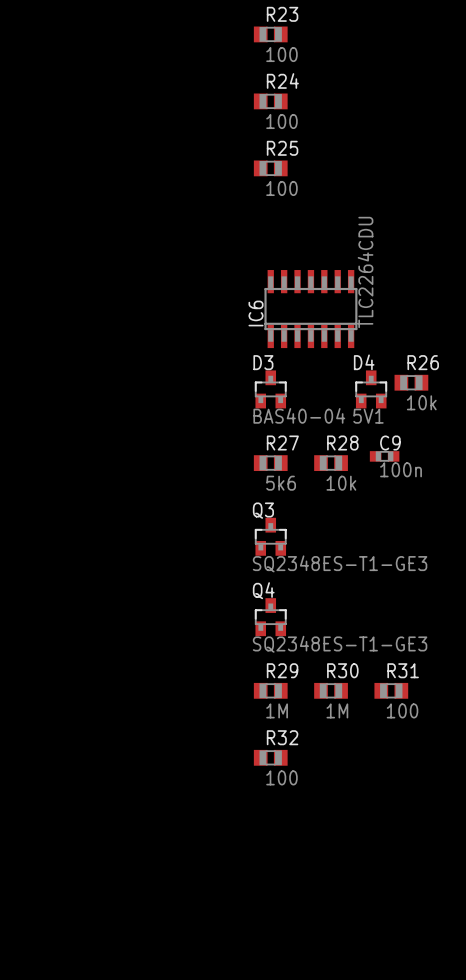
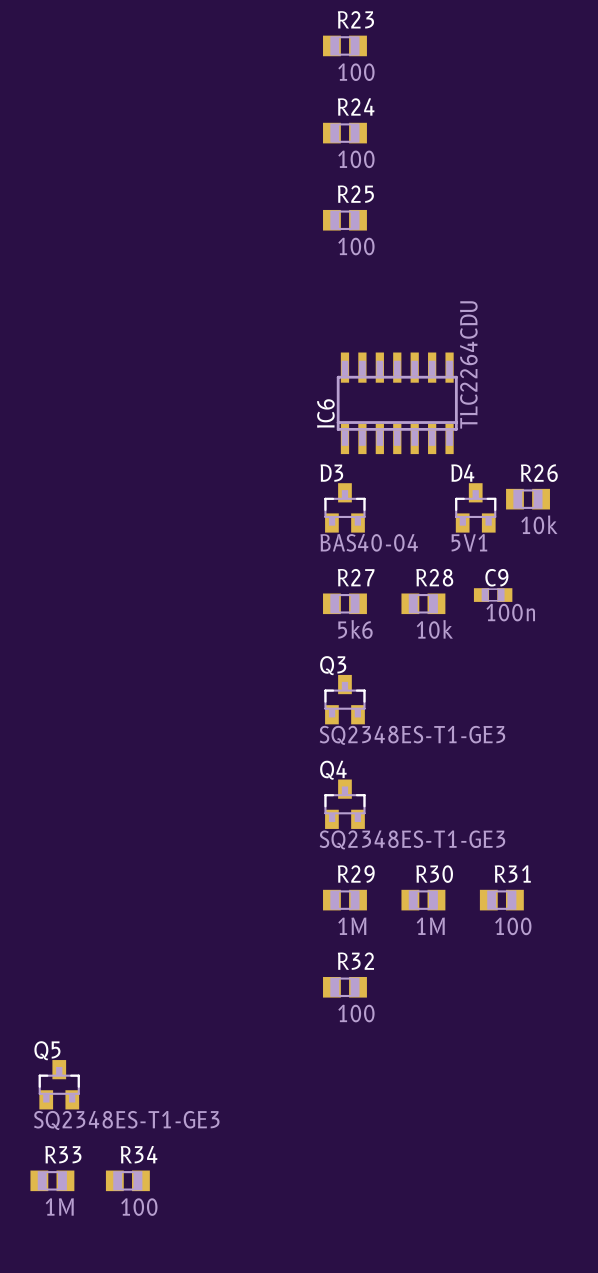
Q5: none -> SQ2348ES-T1-GE3 (59, 1084)
R33: none -> 1M (52, 1180)
R34: none -> 100 (127, 1180)

